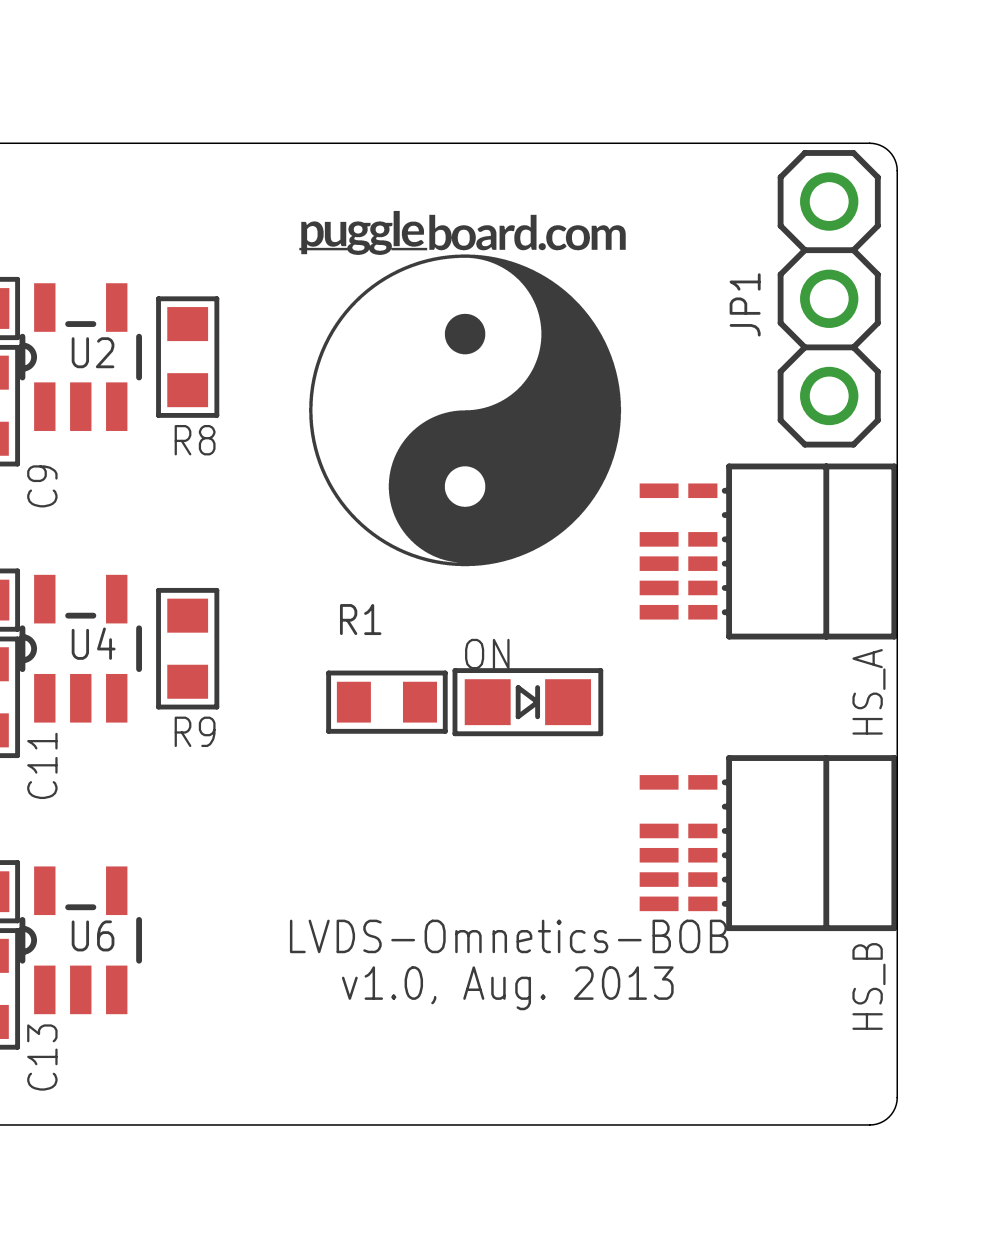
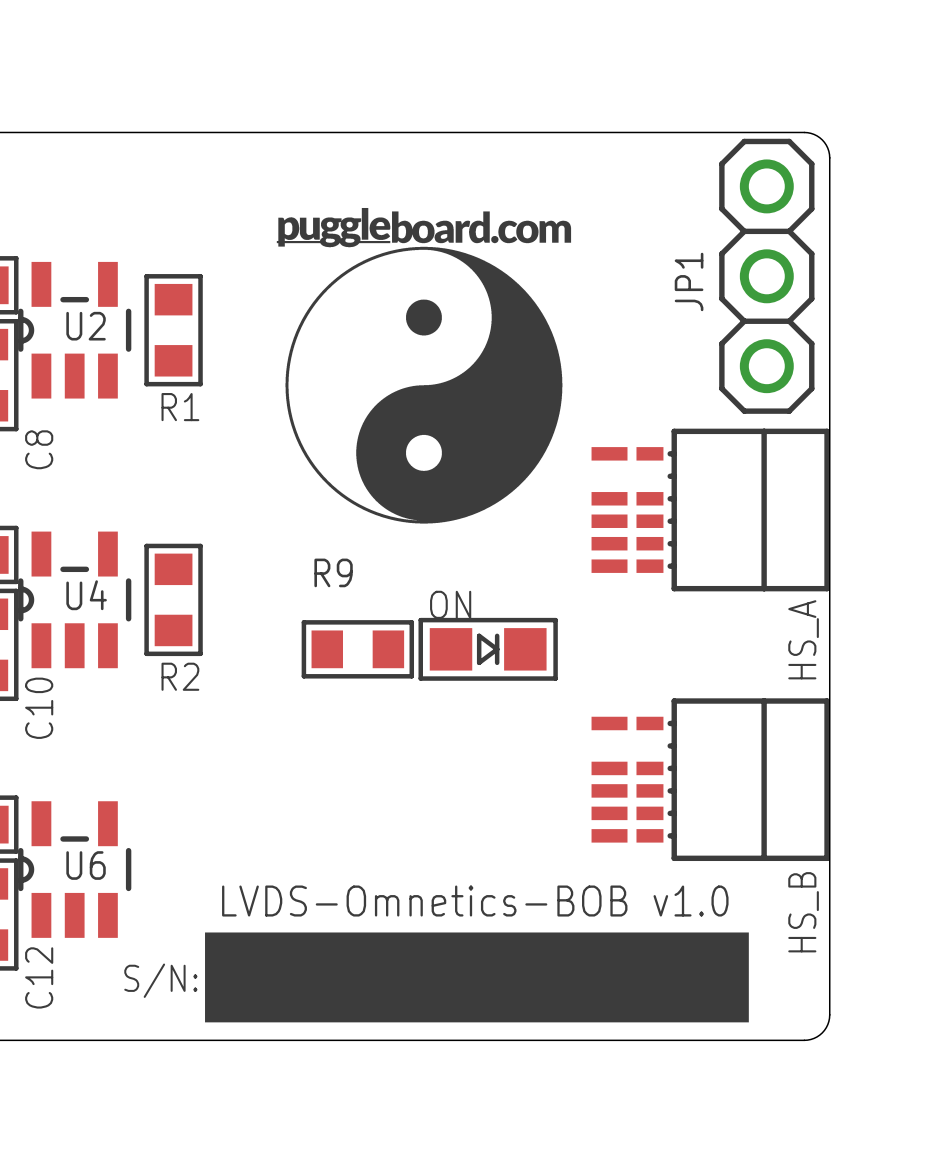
drawing shape: [299, 210, 626, 567] -> [276, 207, 572, 524]
R8 name: R8 (195, 440) -> R1 (180, 407)
C9 name: C9 (42, 486) -> C8 (39, 449)
R1 name: R1 (360, 619) -> R9 (333, 572)
R9 name: R9 (195, 731) -> R2 (180, 676)
C11 name: C11 (42, 765) -> C10 (39, 708)
text: LVDS-Omnetics-BOB (509, 936) -> none
text: v1.0, Aug. 2013 (507, 988) -> LVDS-Omnetics-BOB v1.0 (475, 901)
drawing: none -> [205, 932, 749, 1023]
C13 name: C13 (42, 1057) -> C12 (39, 977)
text: none -> S/N: (160, 980)

